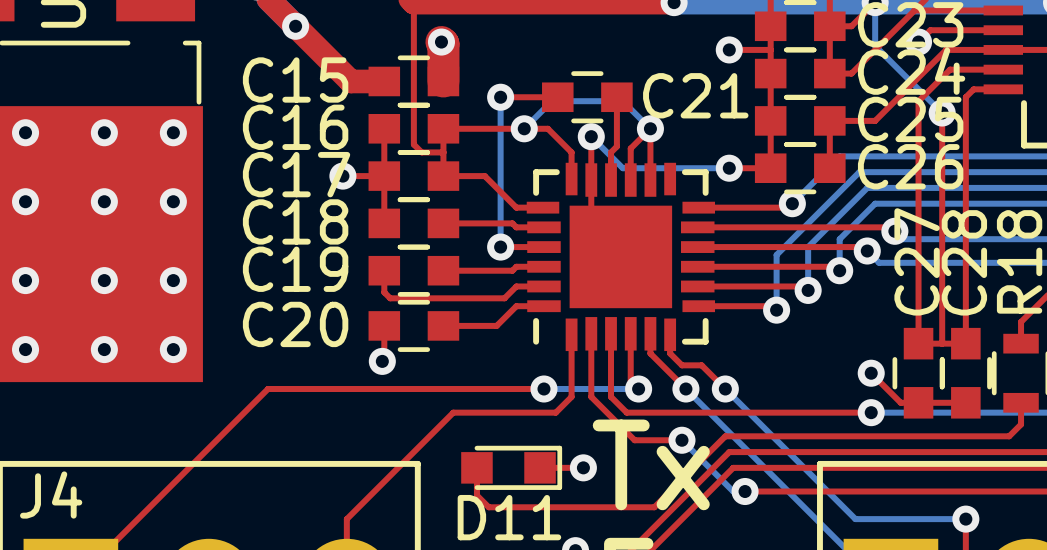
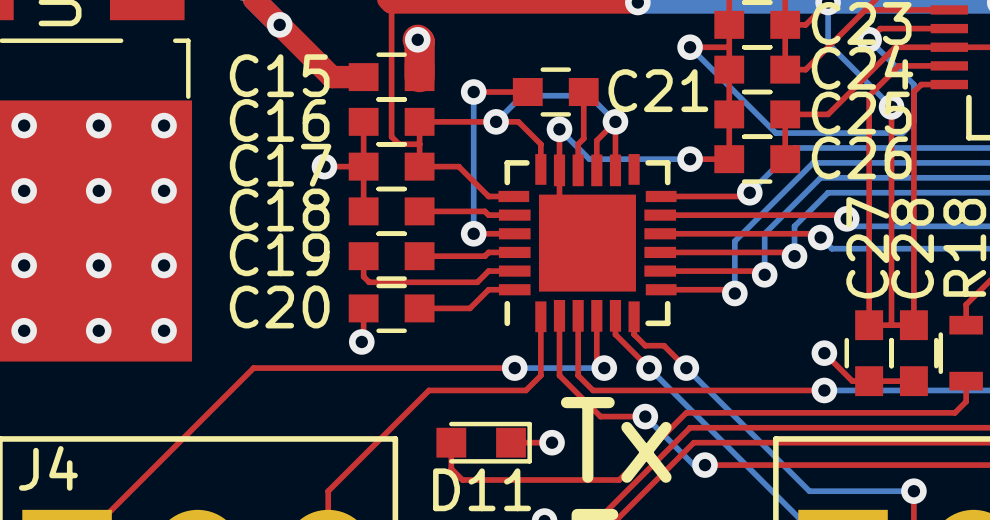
bottom track: none -> (869, 39) (913, 84) (913, 121) (902, 133) (775, 133) (690, 47)

